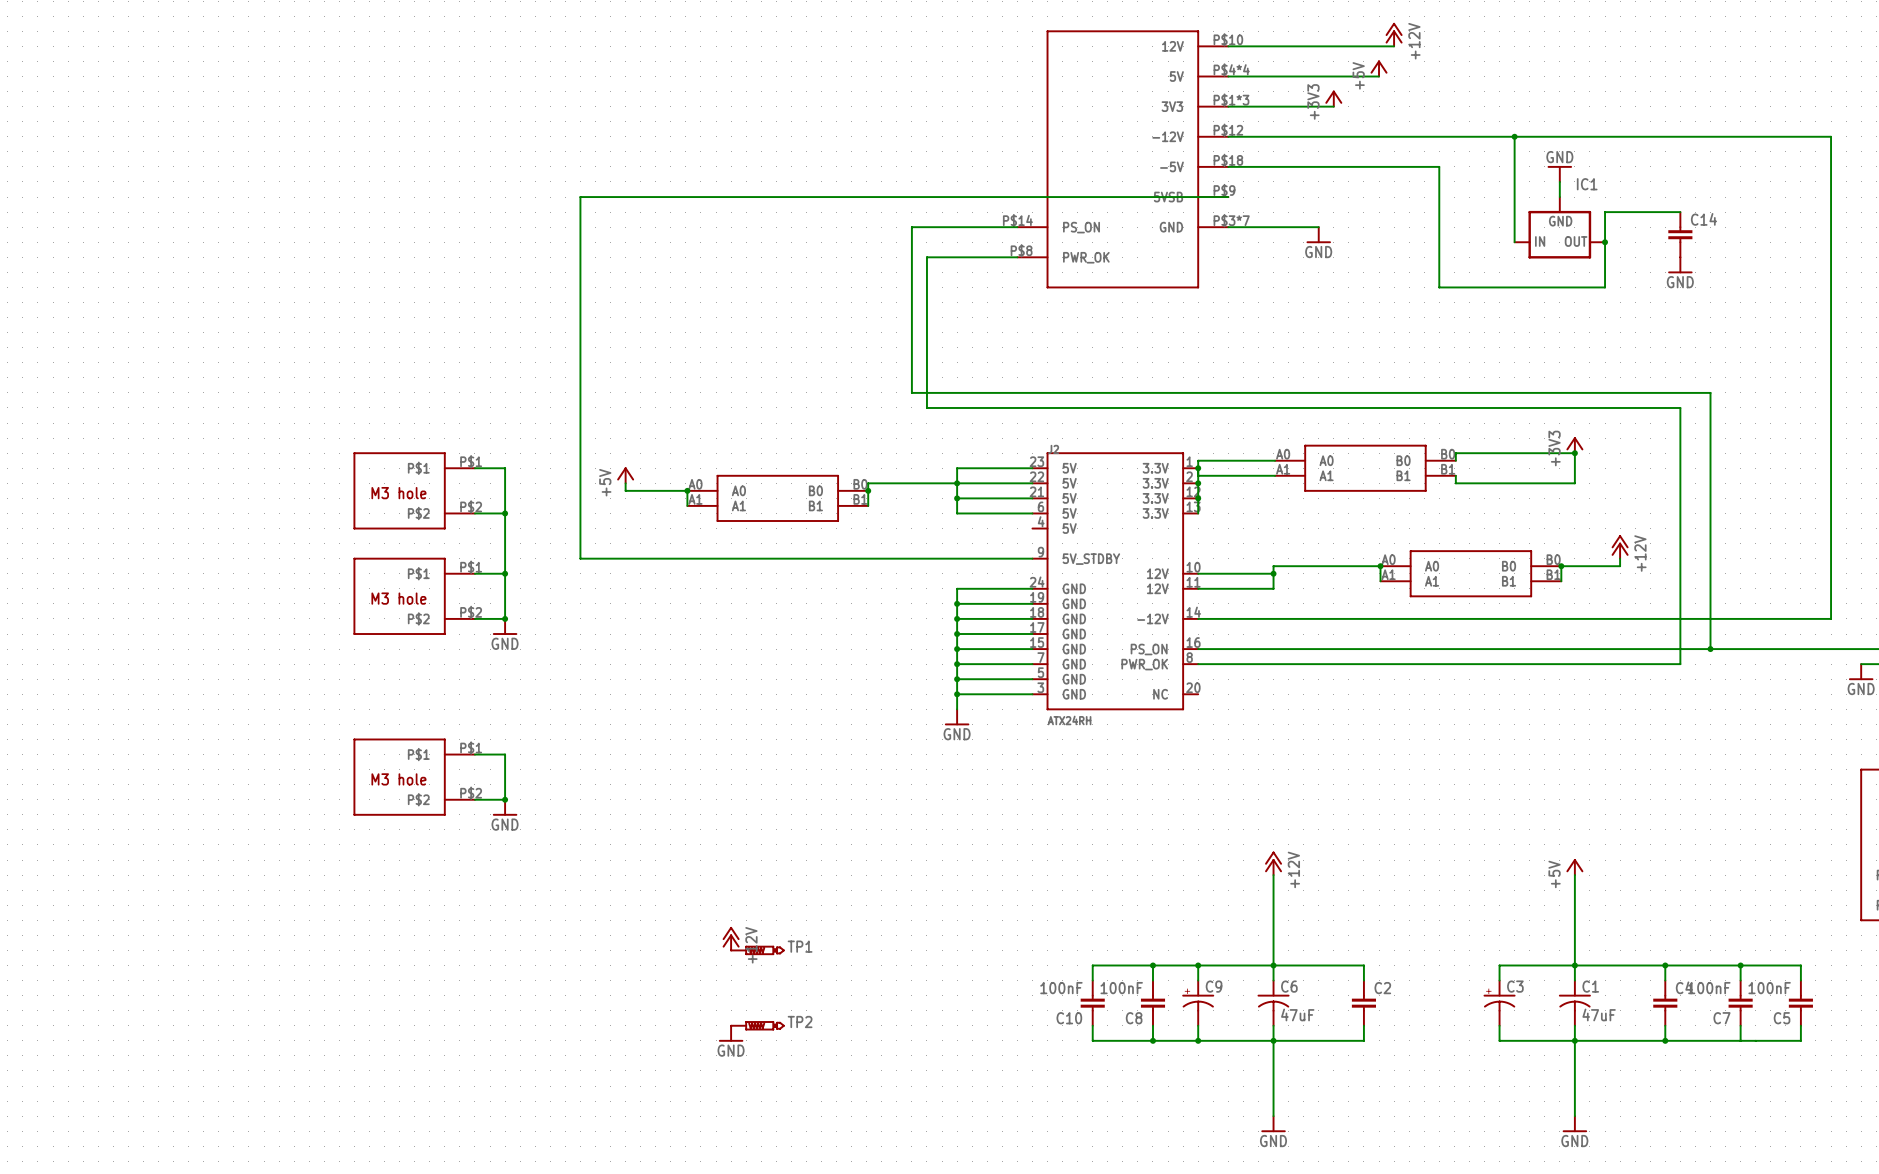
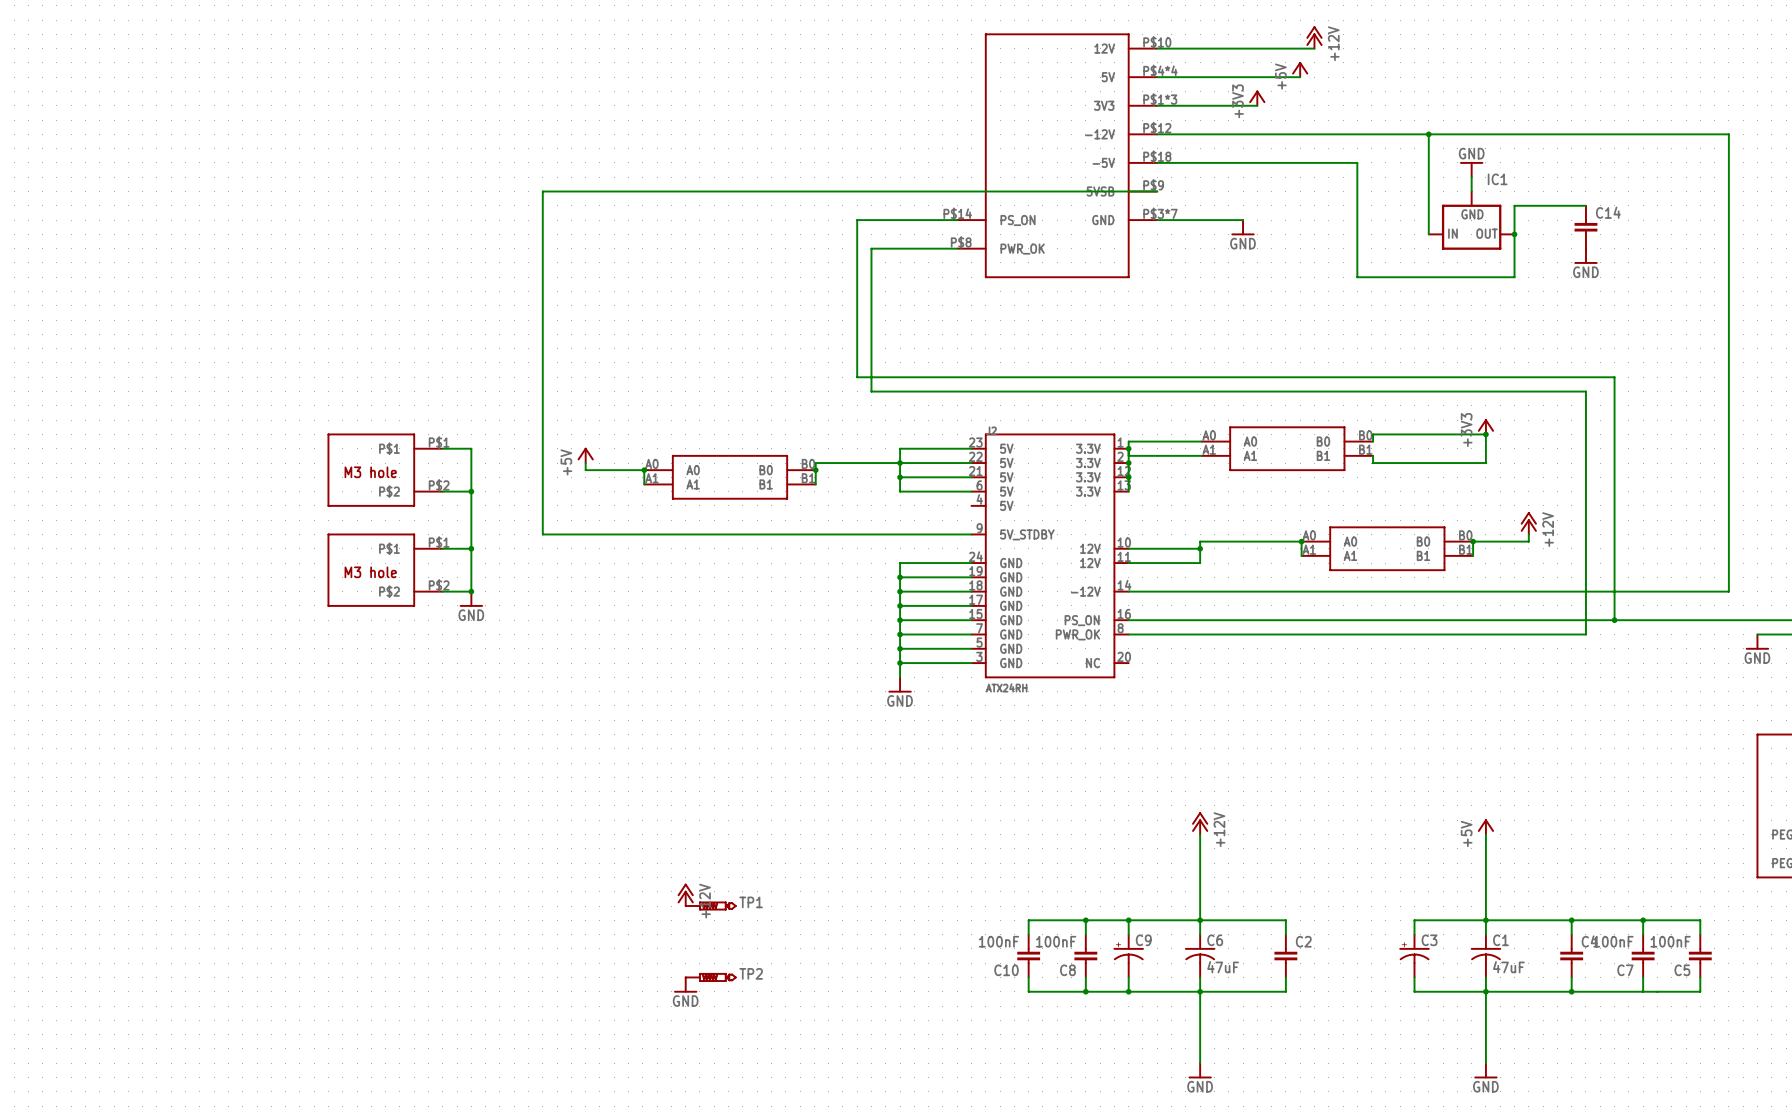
wire: (474, 754) (505, 754) (505, 799) (474, 799) -> none
part: (414, 777) -> none
junction: (505, 799) -> none
power symbol: GND (505, 807) -> none

